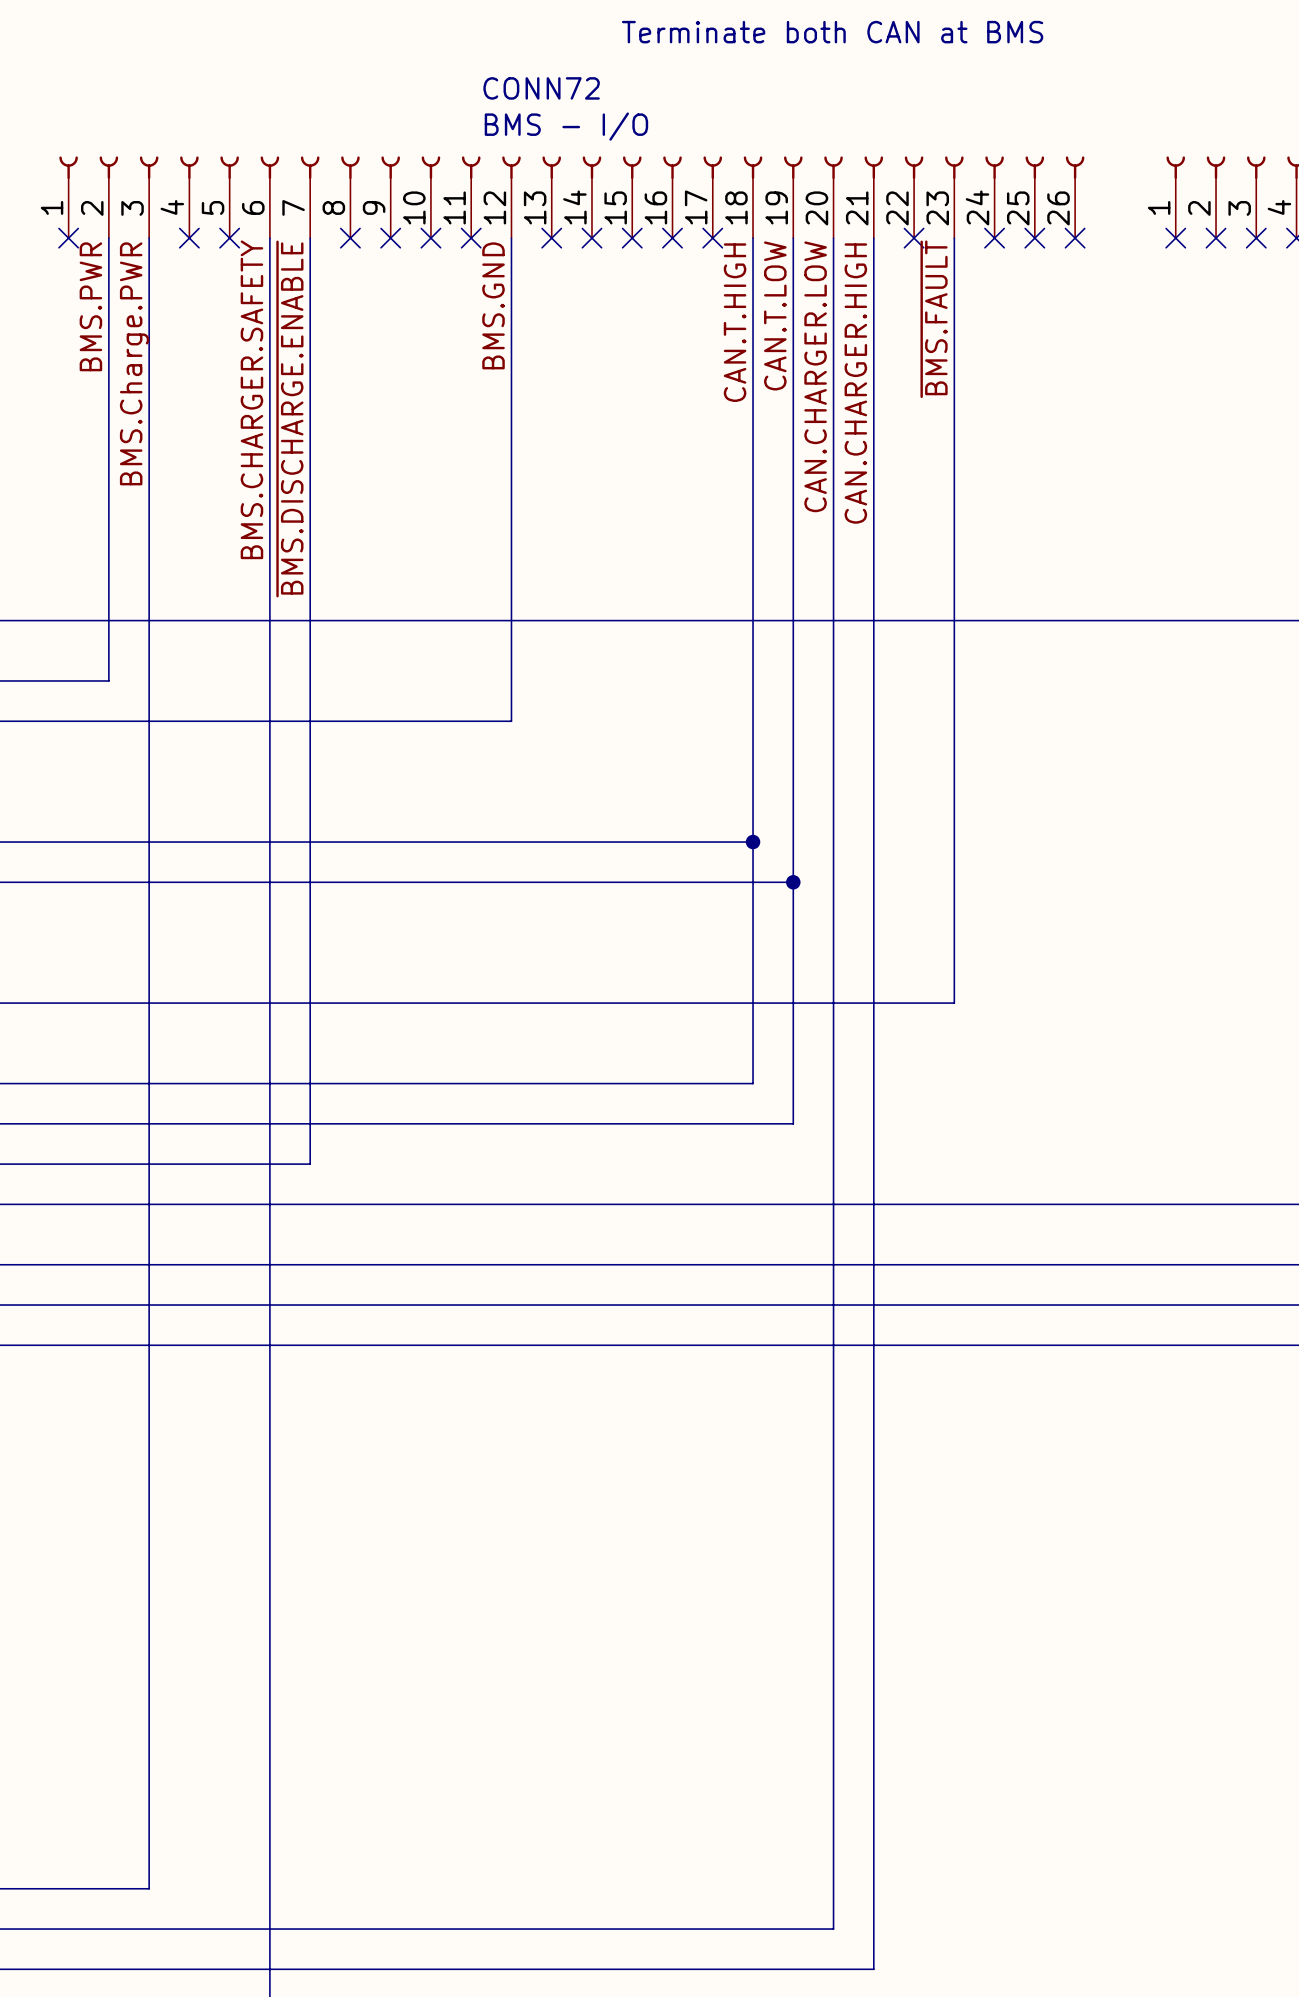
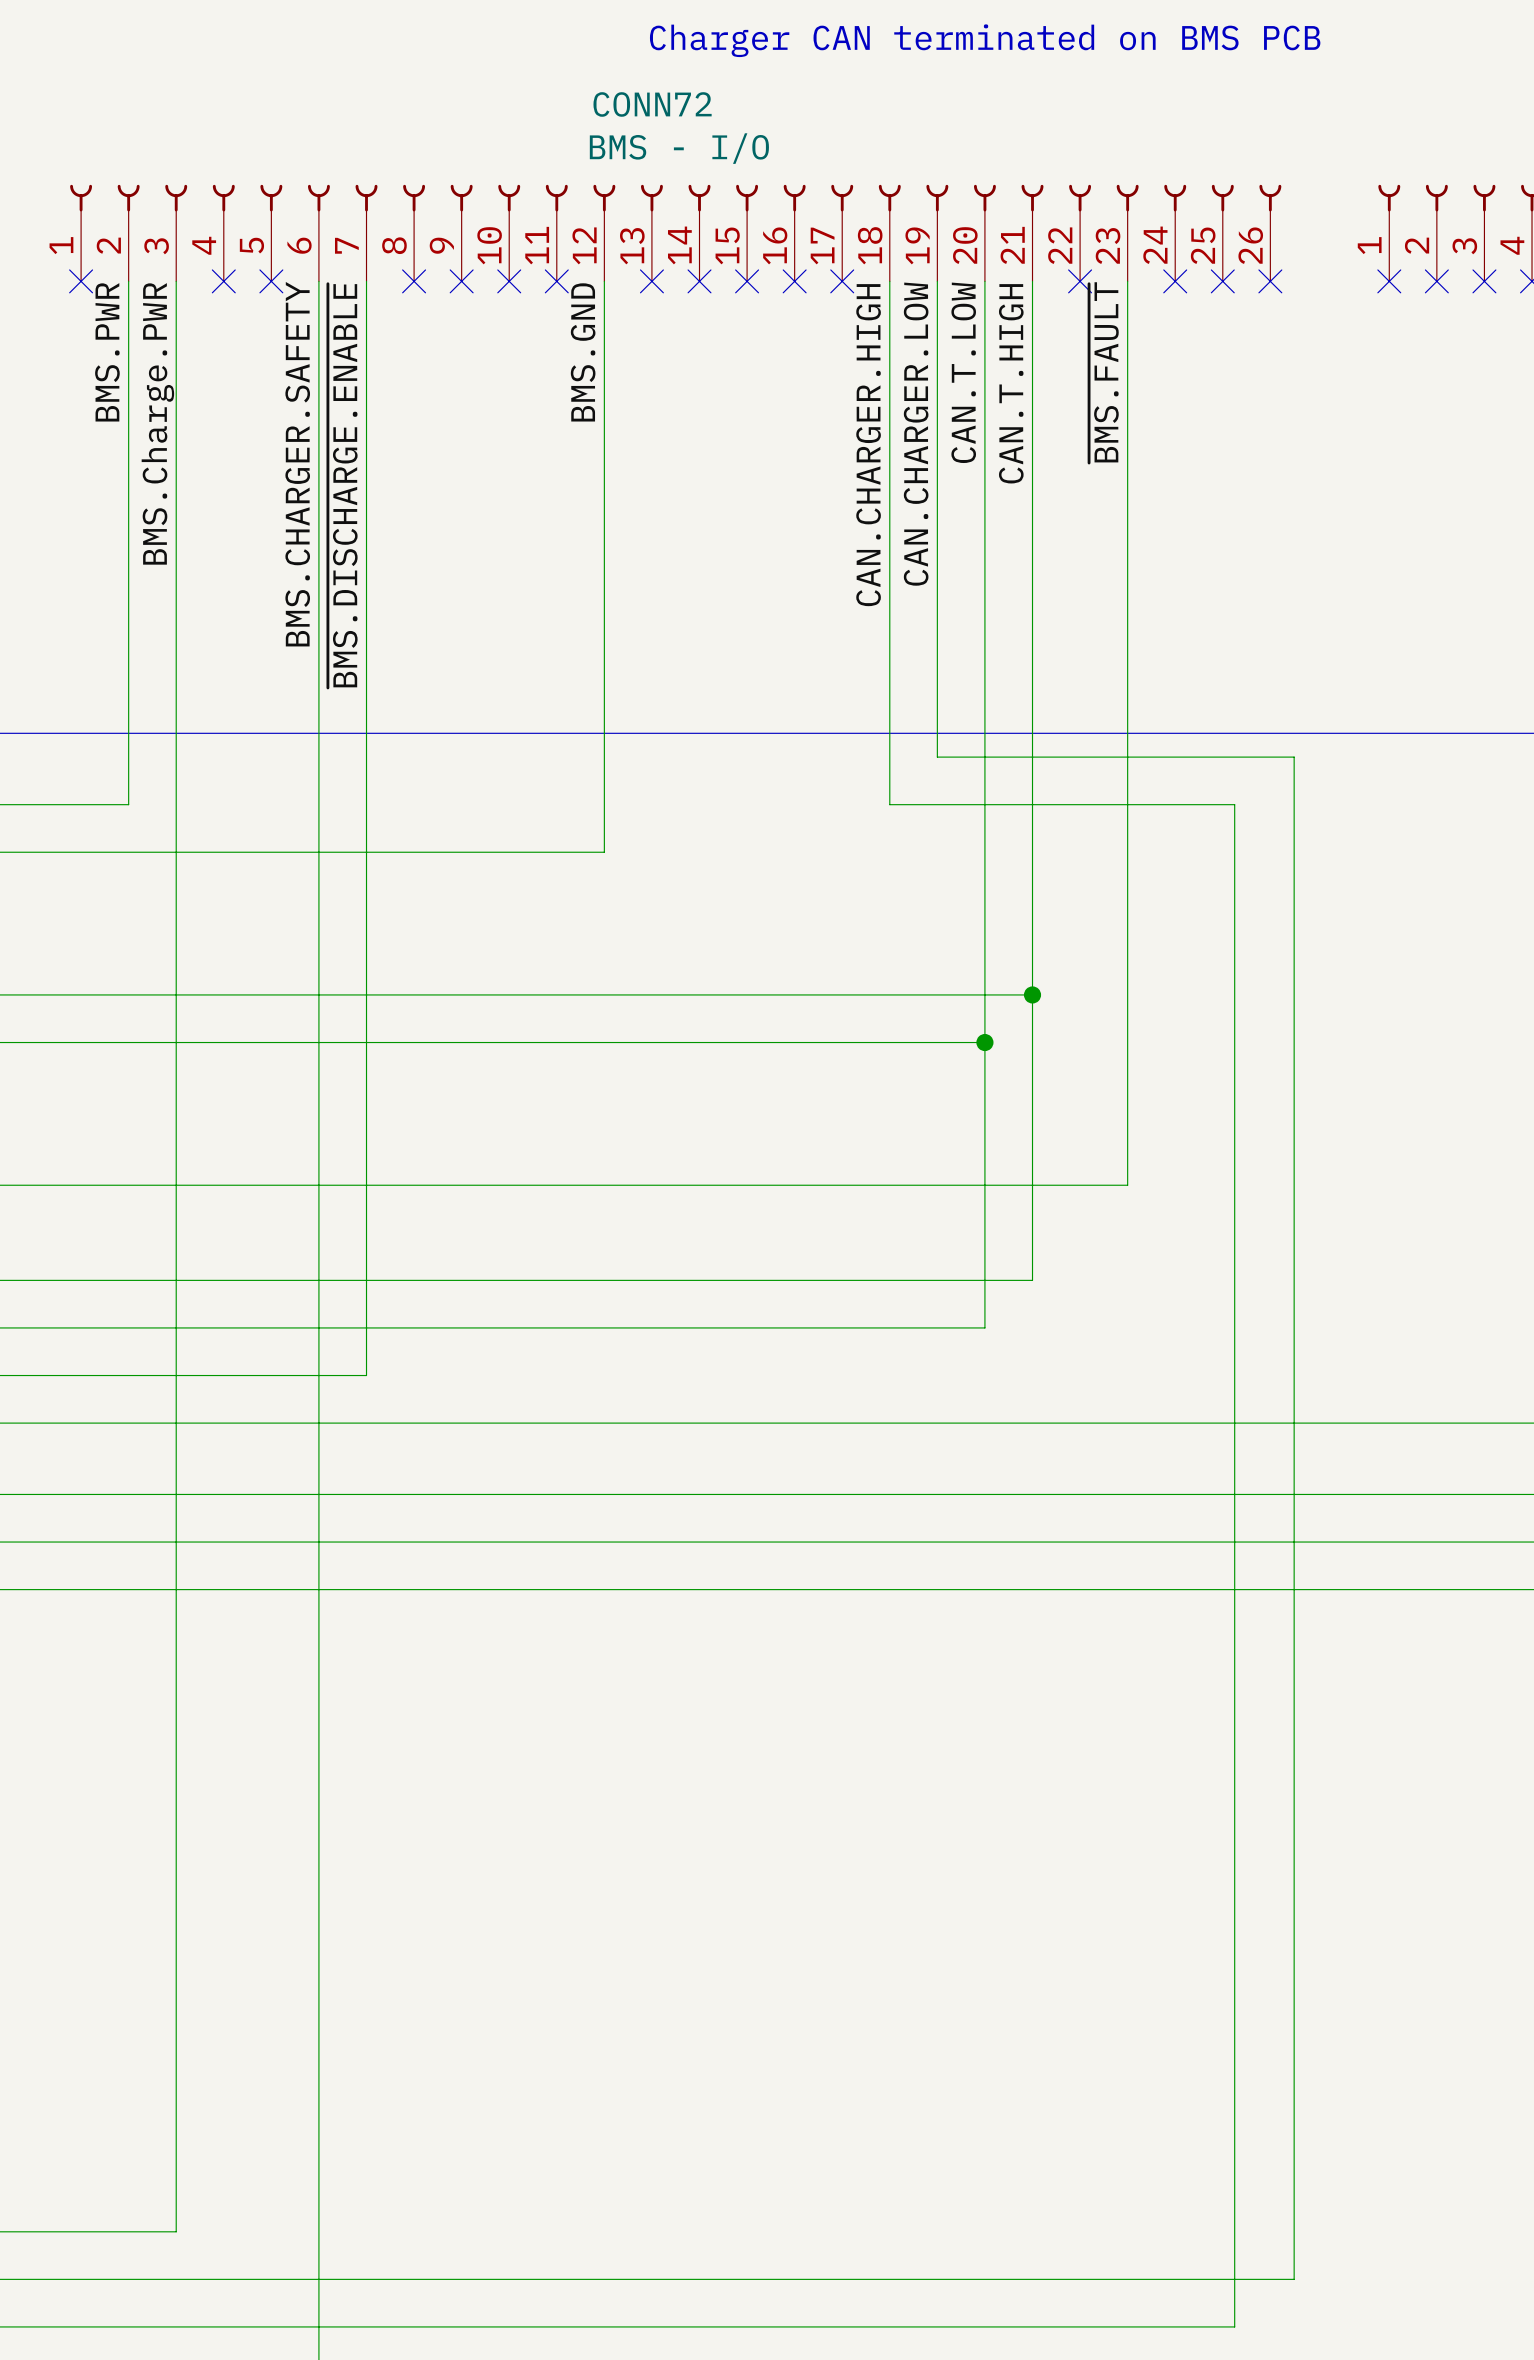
text: Terminate both CAN at BMS (832, 32) -> Charger CAN terminated on BMS PCB (985, 40)
label: CAN.T.LOW (775, 315) -> CAN.CHARGER.LOW (916, 434)
label: CAN.T.HIGH (735, 322) -> CAN.CHARGER.HIGH (868, 445)
label: CAN.CHARGER.LOW (815, 376) -> CAN.T.LOW (963, 372)
label: CAN.CHARGER.HIGH (855, 383) -> CAN.T.HIGH (1011, 383)
wire: (793, 640) (793, 1123) -> (984, 1327) (937, 1327)
wire: (753, 680) (753, 1083) -> (1032, 1280) (889, 1280)
wire: none -> (889, 994) (1032, 994)
junction: (753, 842) -> none
junction: none -> (1032, 994)
wire: none -> (937, 1042) (984, 1042)
junction position: (793, 882) -> (984, 1042)
wire: (873, 1083) (873, 1969) -> (889, 804) (1234, 804) (1234, 2326) (1032, 2326)
wire: (833, 1123) (833, 1929) -> (937, 757) (1294, 757) (1294, 2279) (984, 2279)

